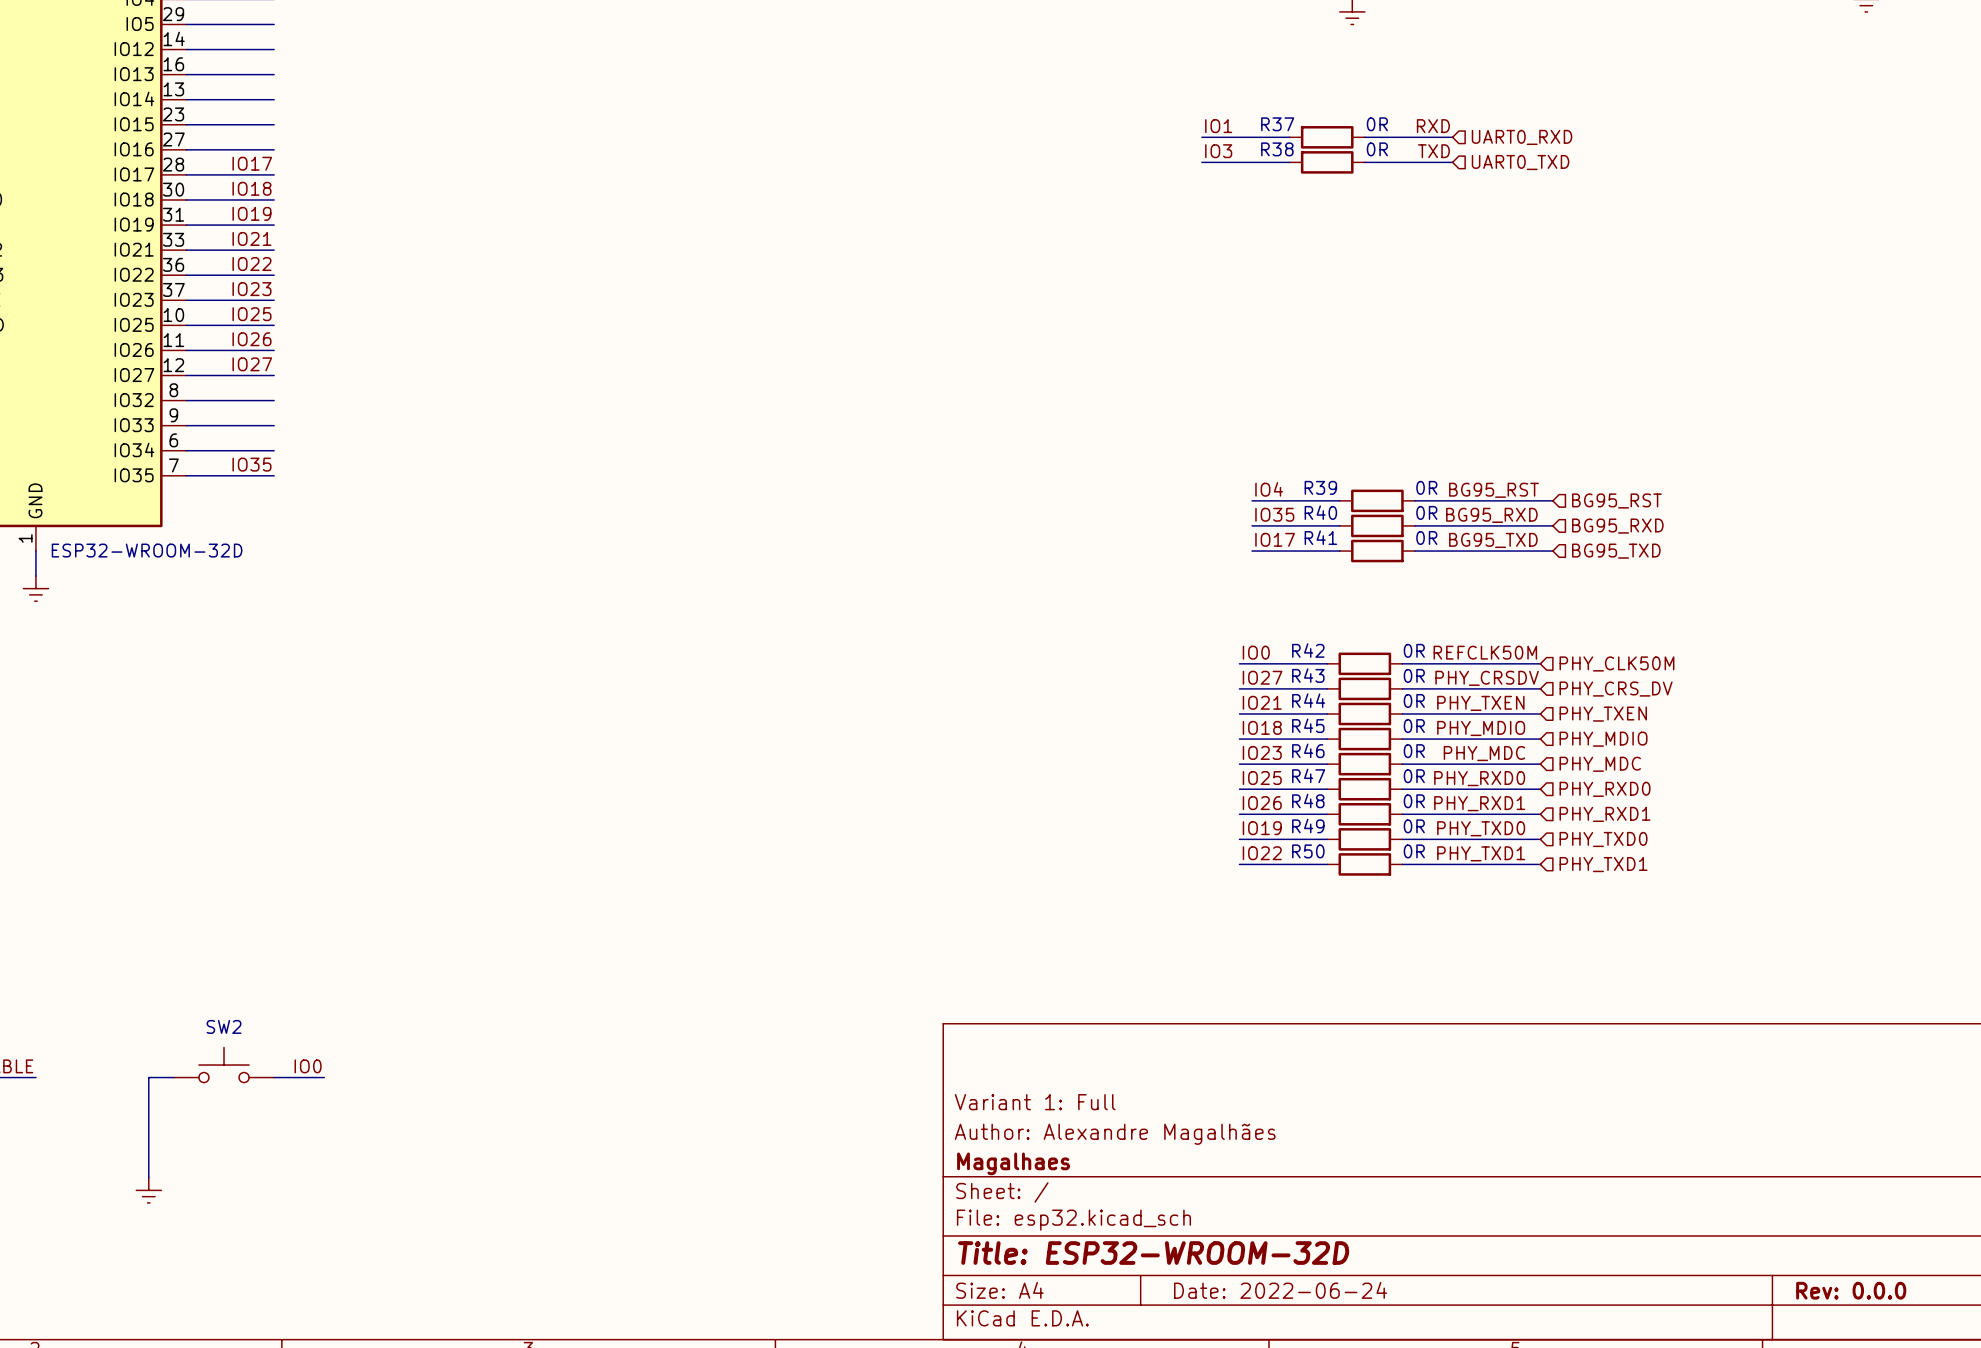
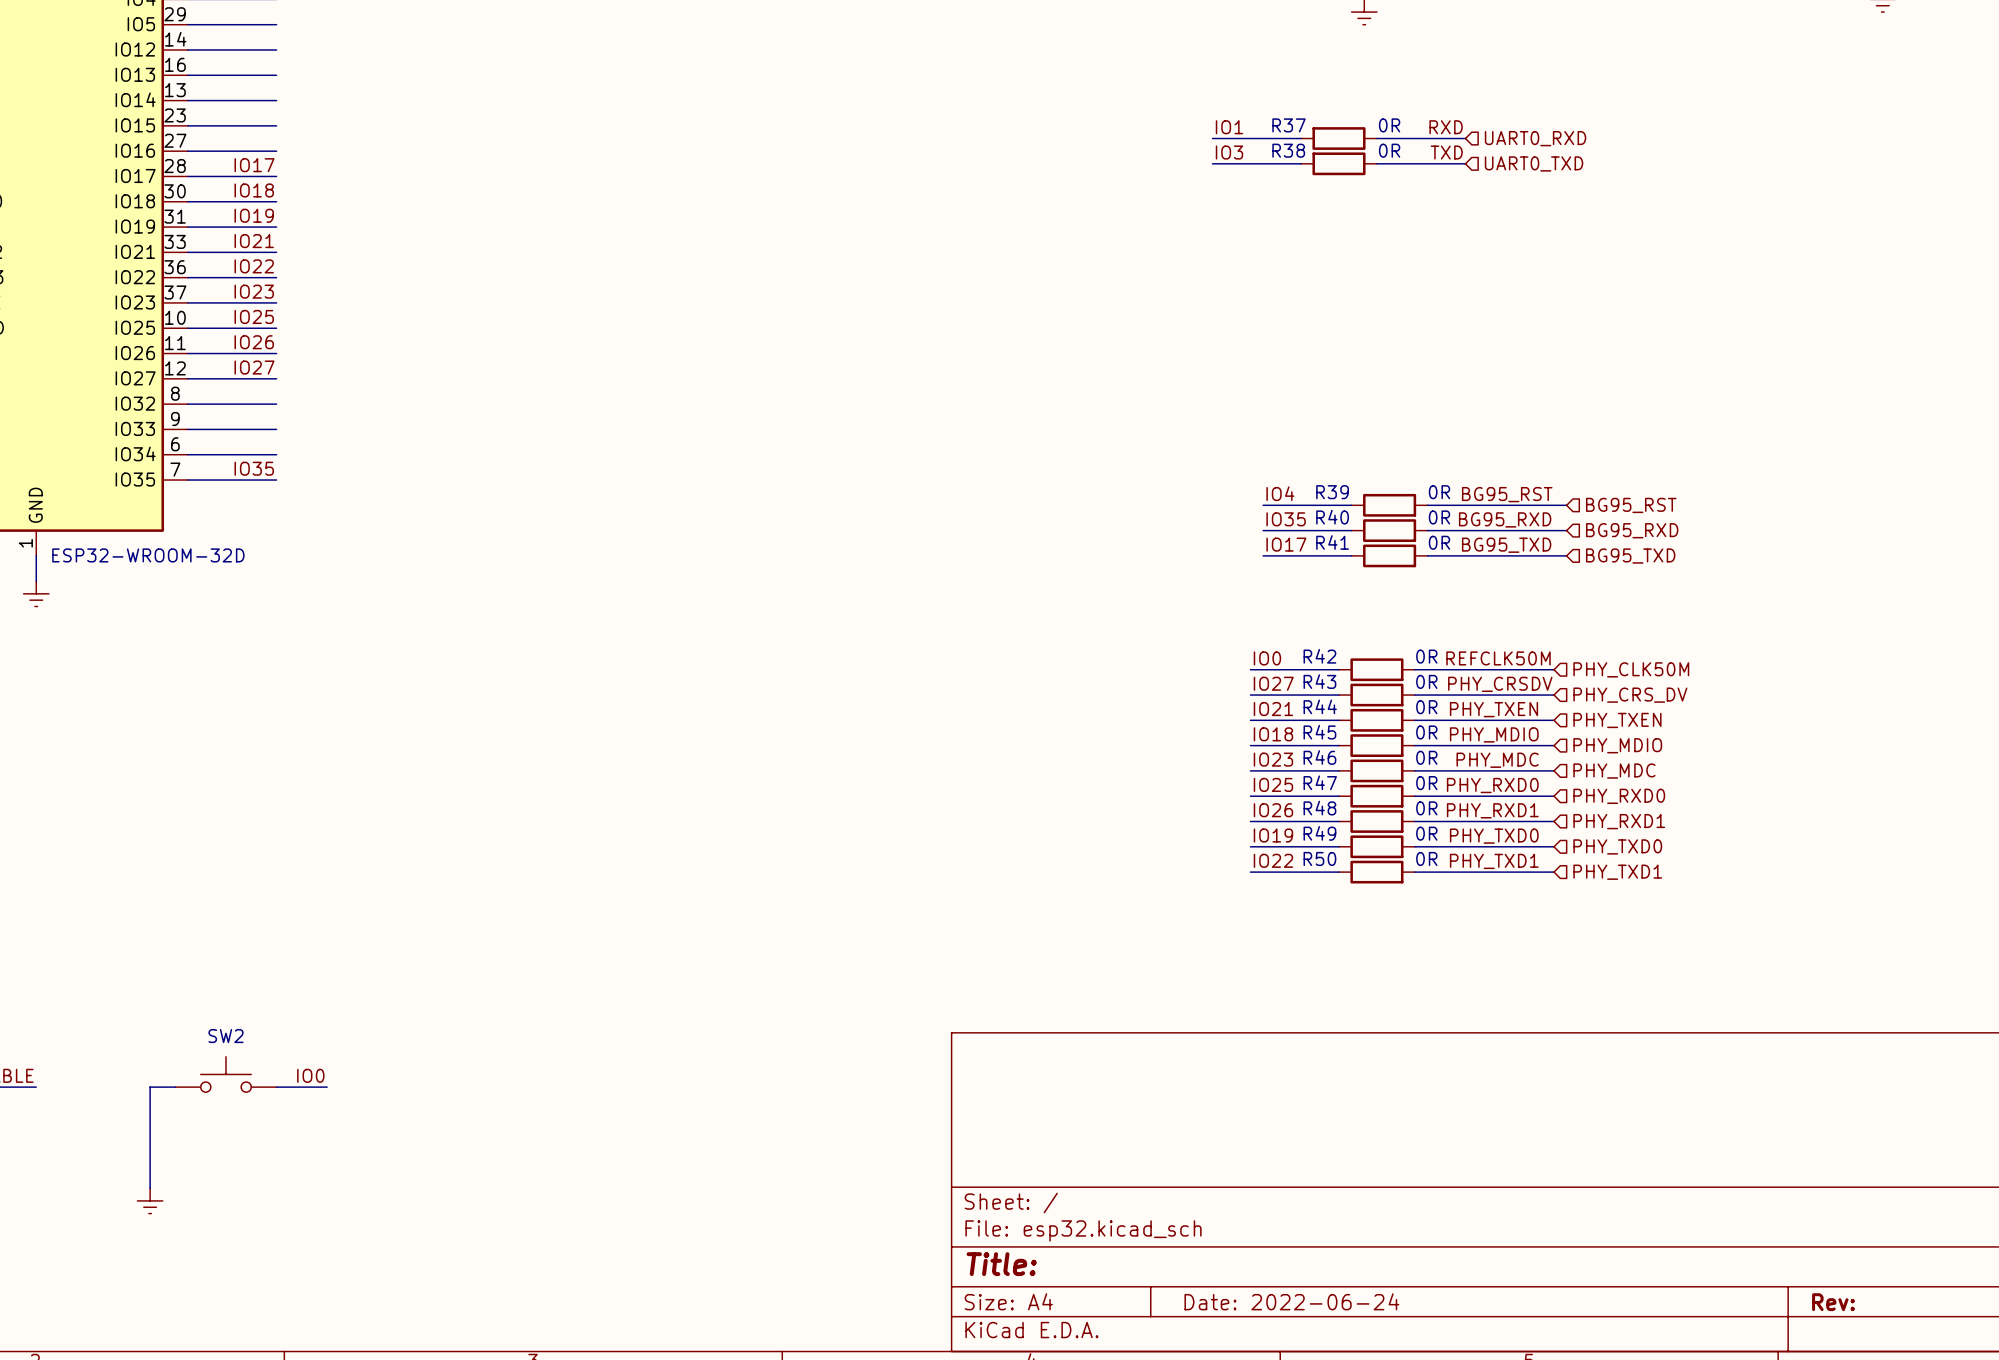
title block: Variant 1: Full (1035, 1102) -> none
title block: Author: Alexandre Magalhães (1115, 1134) -> none
title block: Magalhaes (1013, 1163) -> none
title block: Title: ESP32-WROOM-32D (1153, 1253) -> Title: (1001, 1264)
title block: Rev: 0.0.0 (1851, 1290) -> Rev: (1833, 1302)

